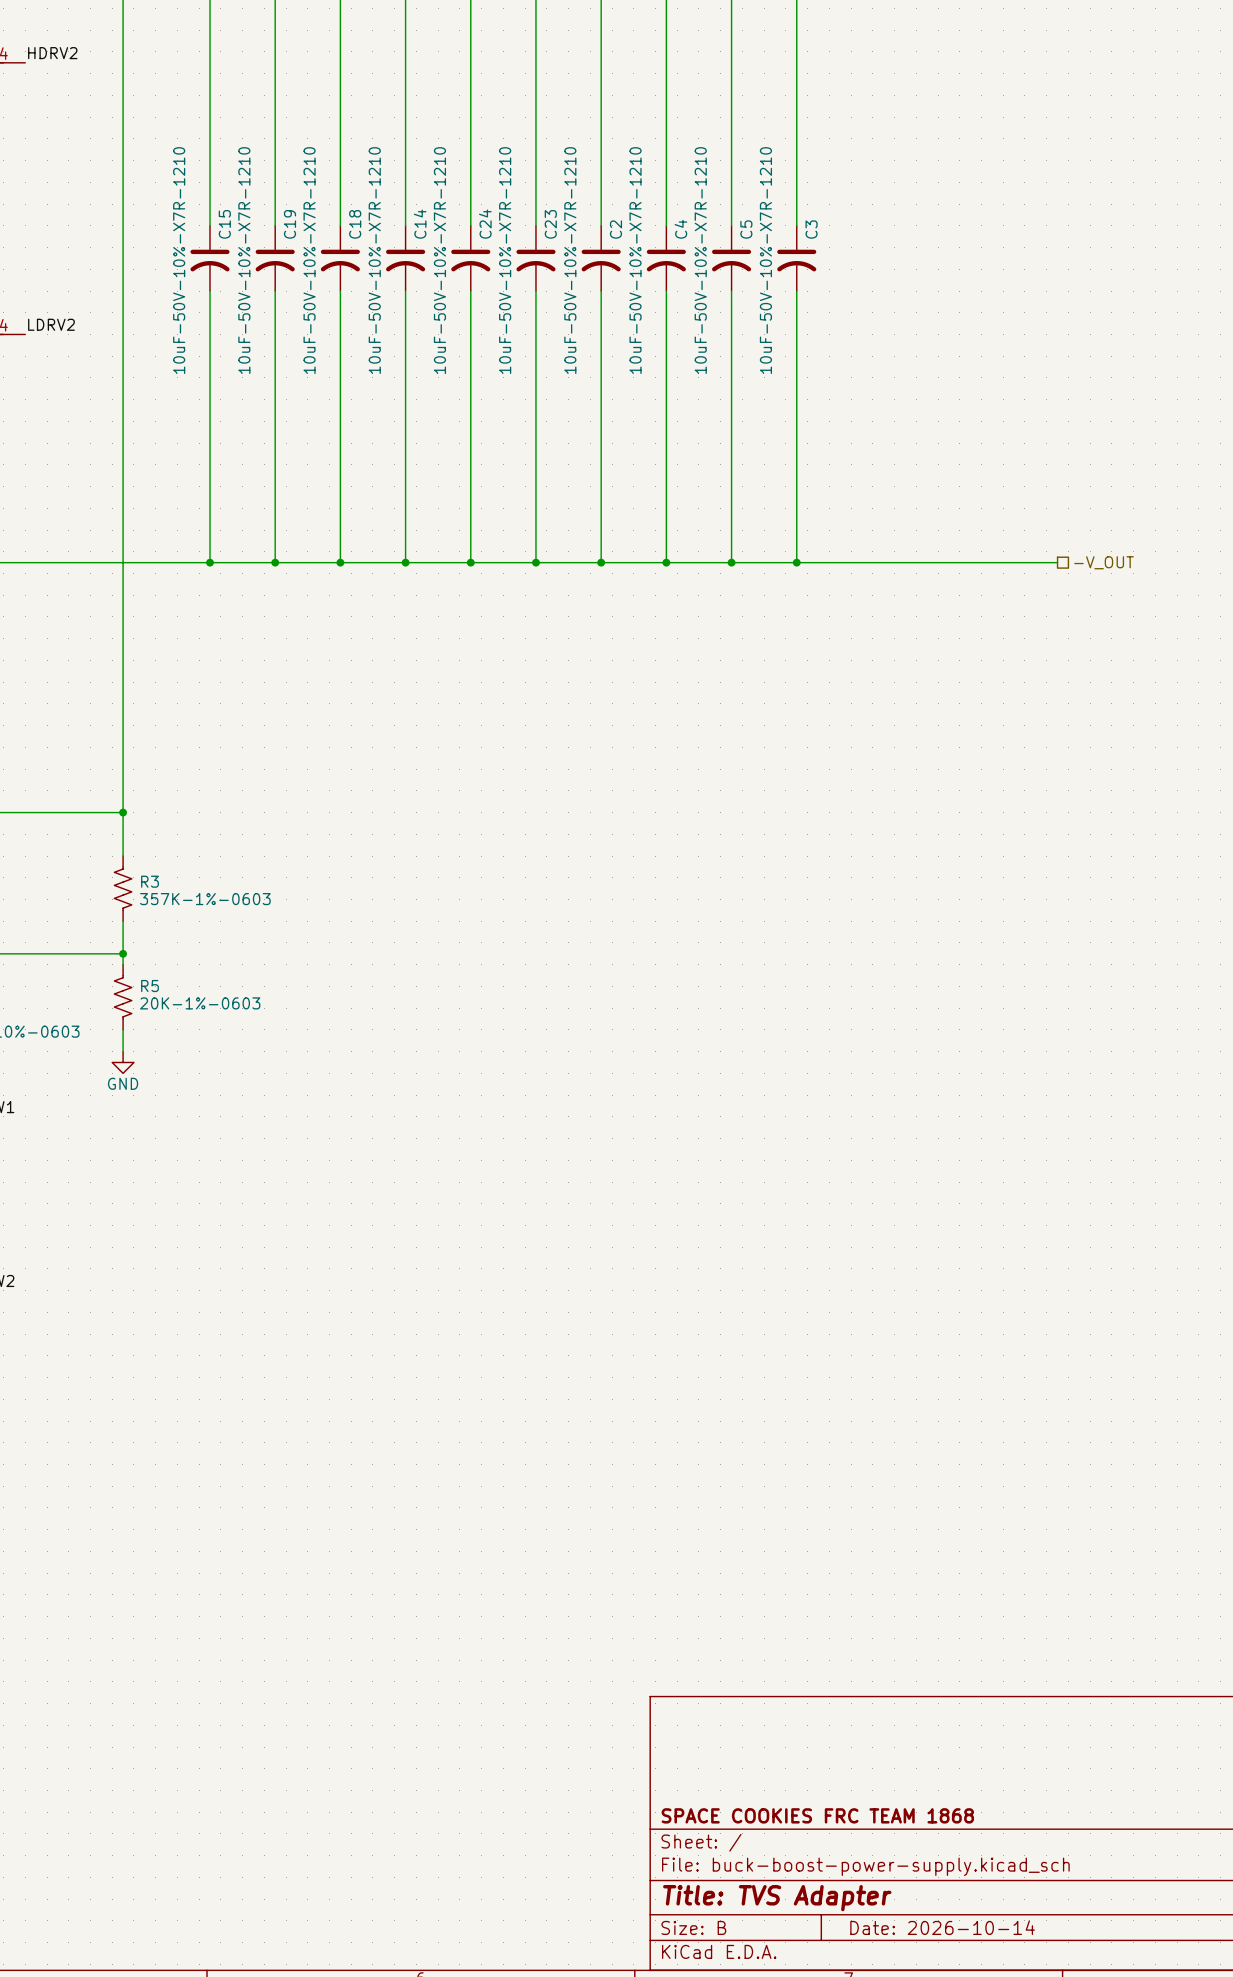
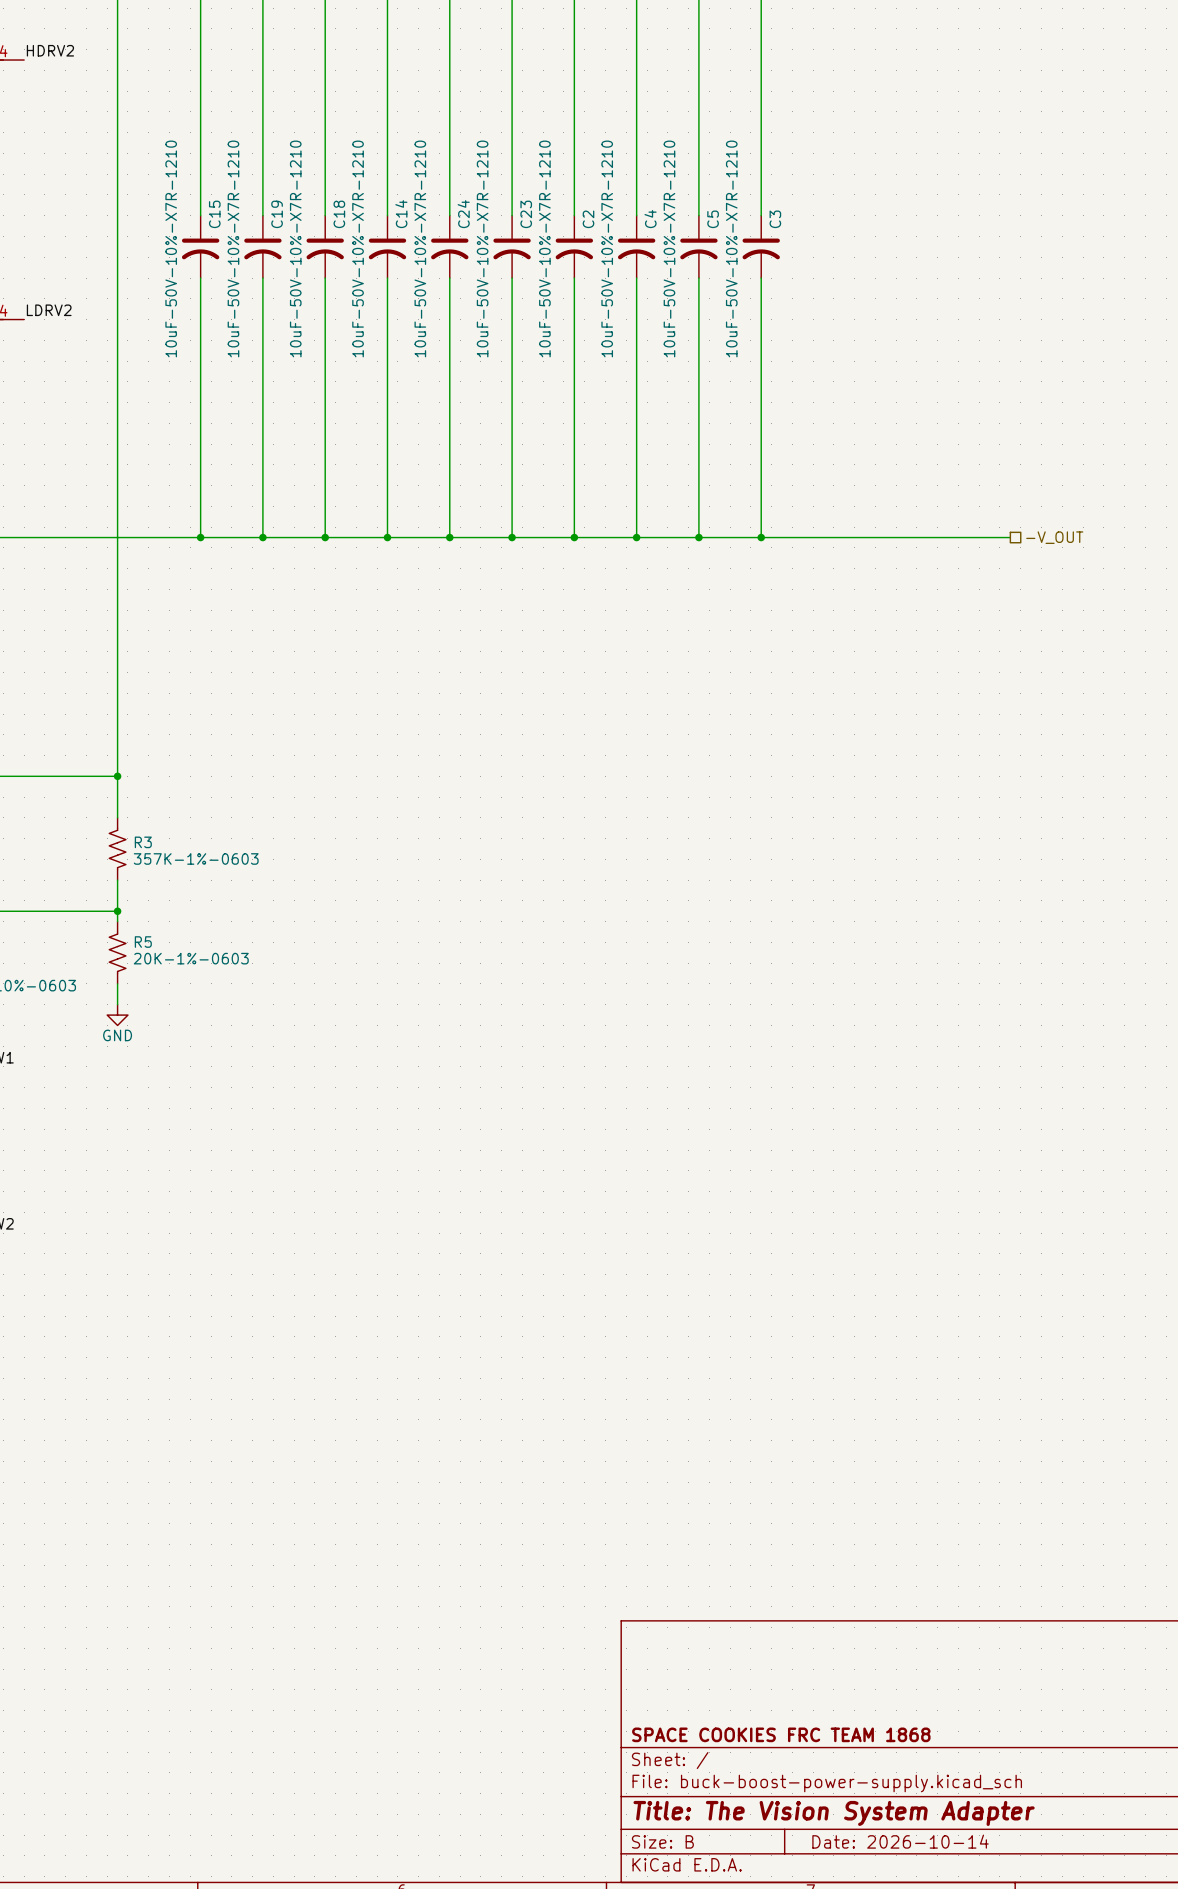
title block: Title: TVS Adapter (777, 1898) -> Title: The Vision System Adapter (834, 1813)

